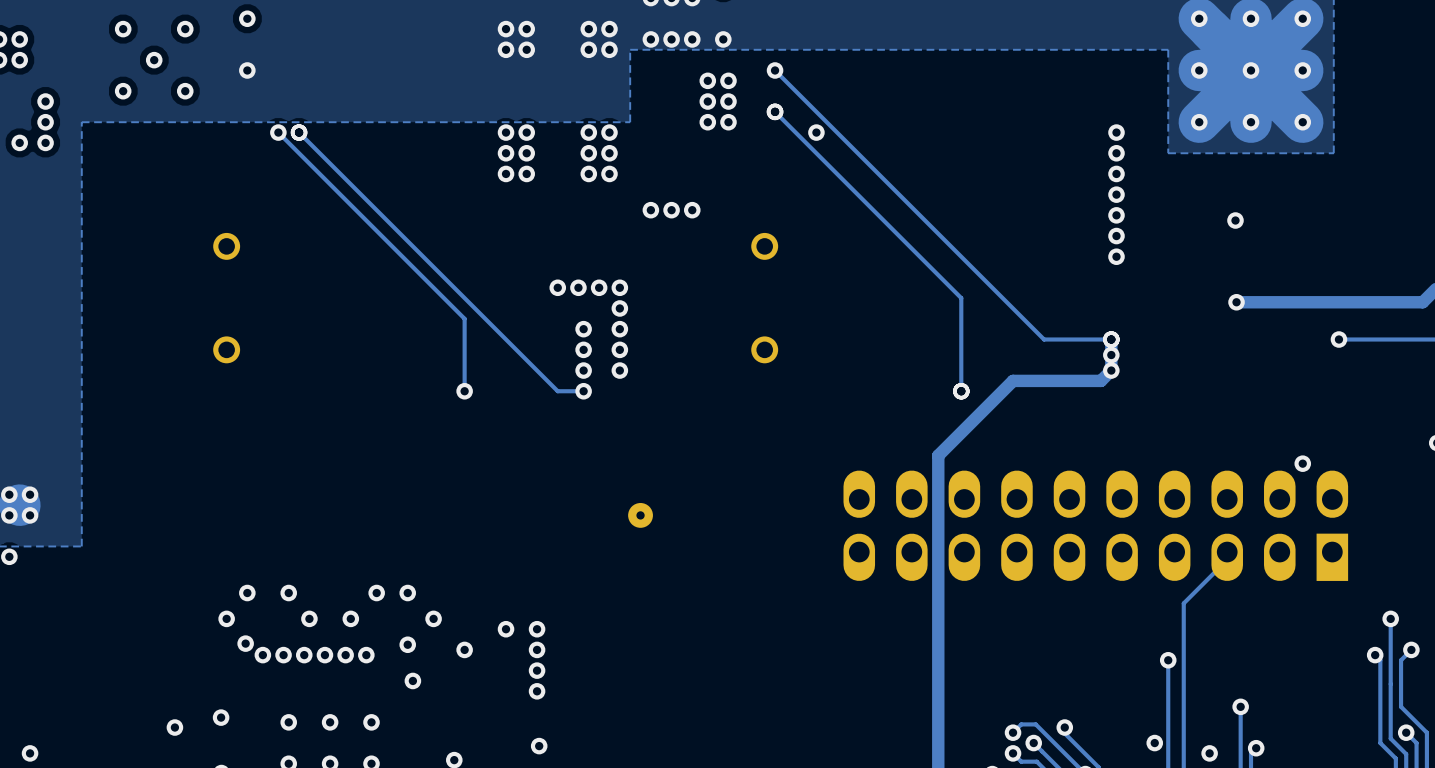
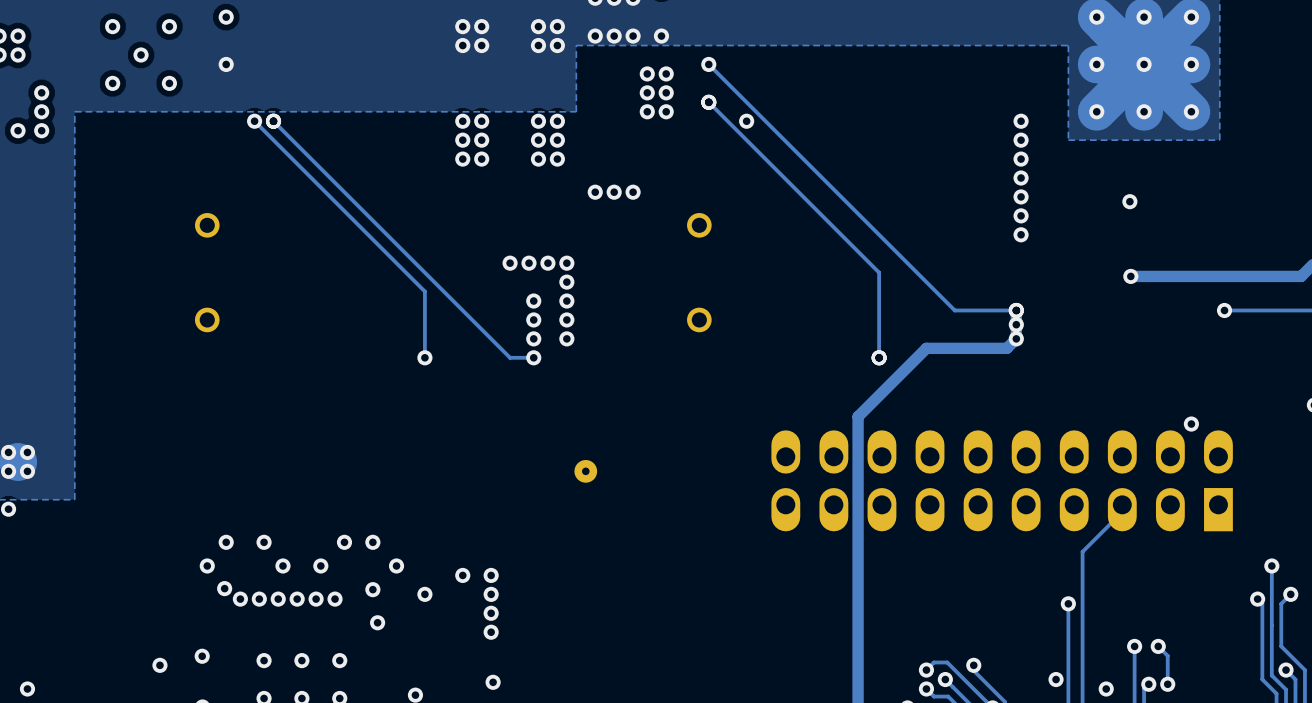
track: none -> (1158, 646) (1167, 655) (1167, 684)
via: none -> (1158, 646)
via: none -> (1167, 684)

